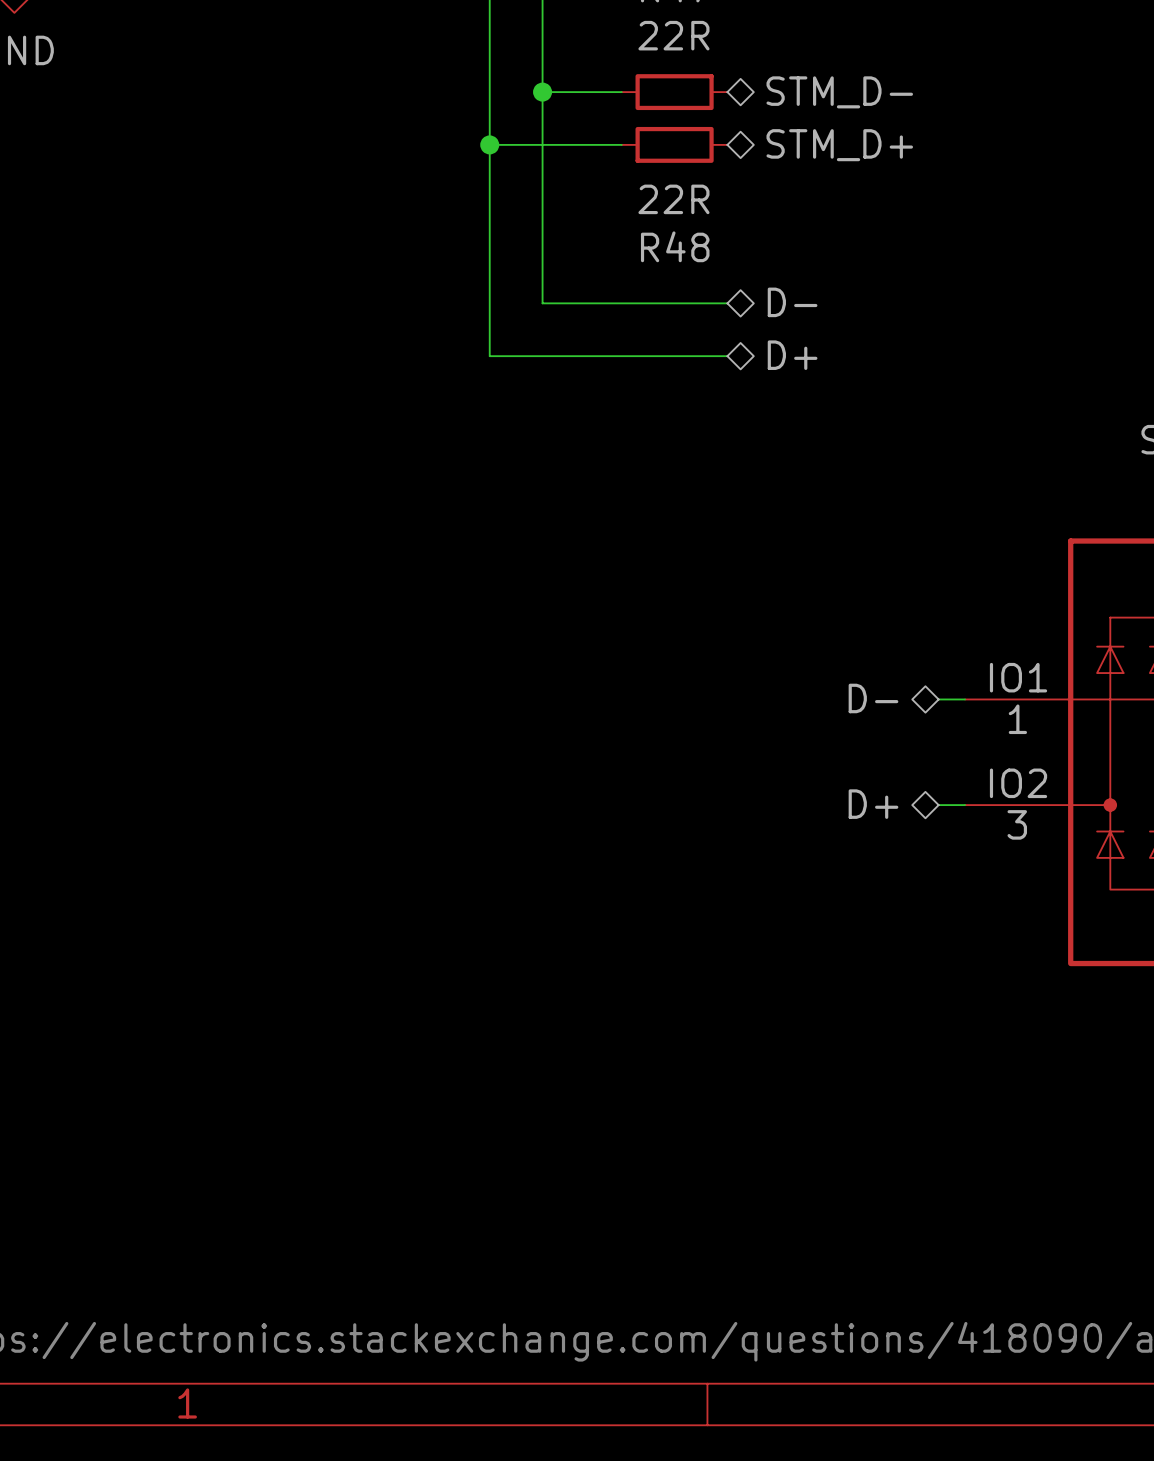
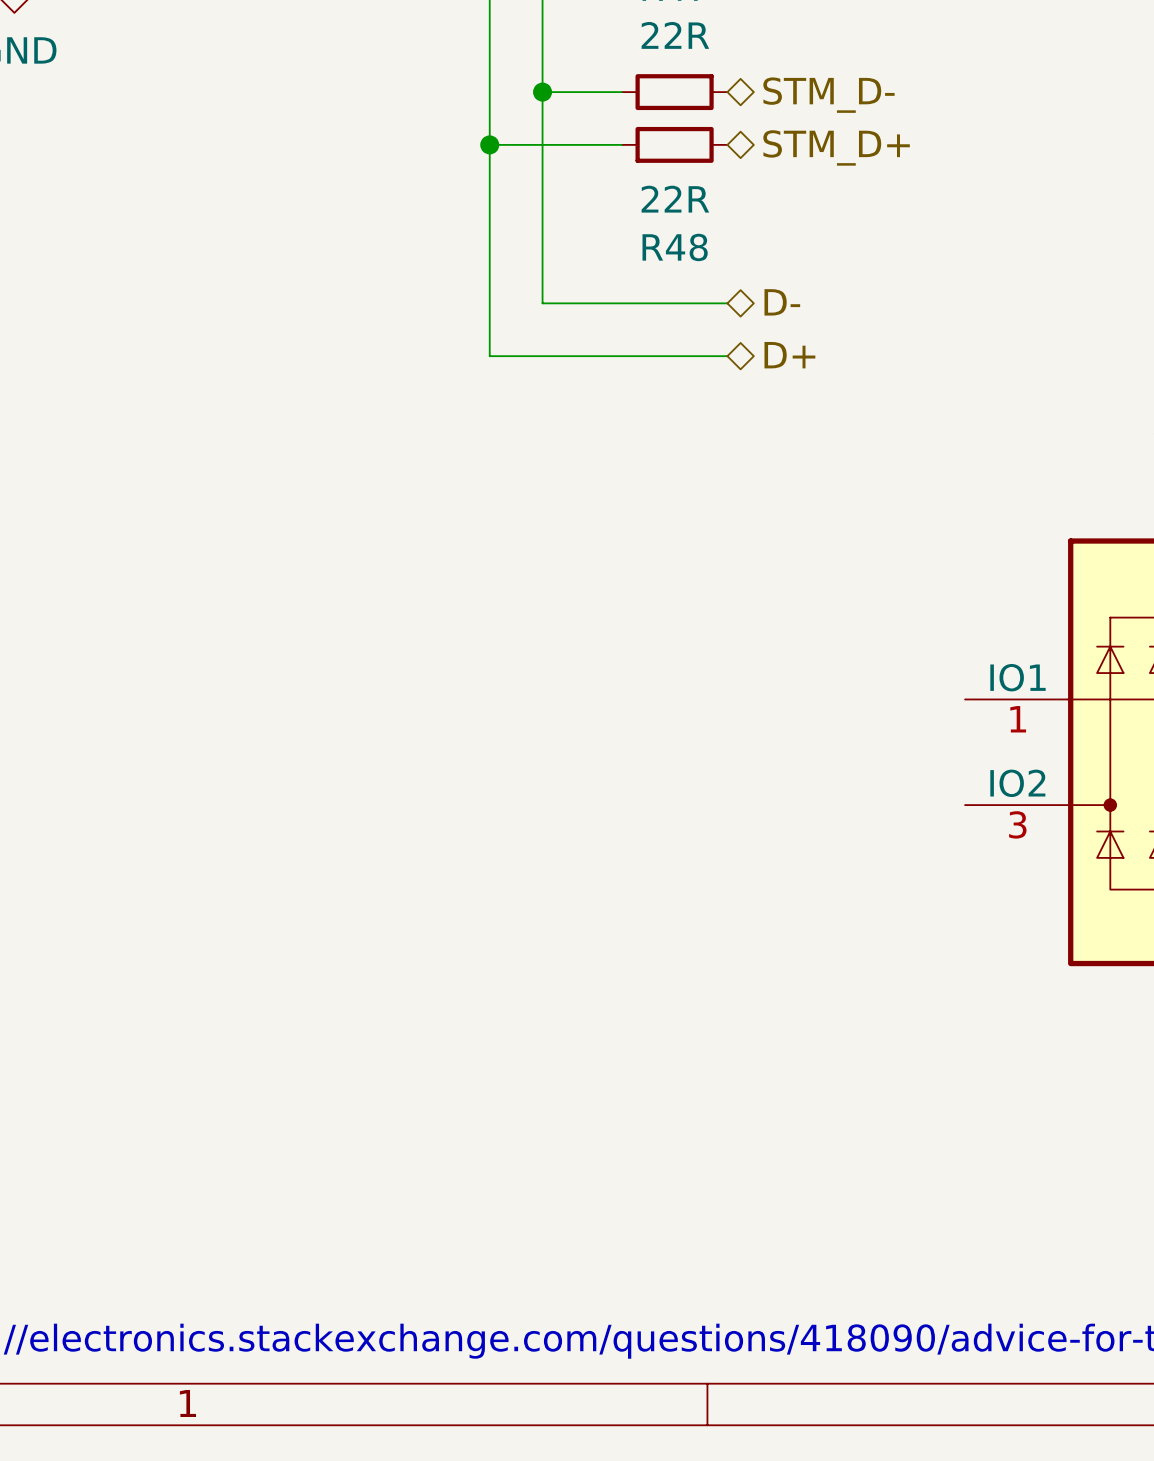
hierarchical label: D- (873, 698) -> none
wire: (938, 699) (965, 699) -> none
hierarchical label: D+ (873, 804) -> none
wire: (938, 805) (965, 805) -> none

